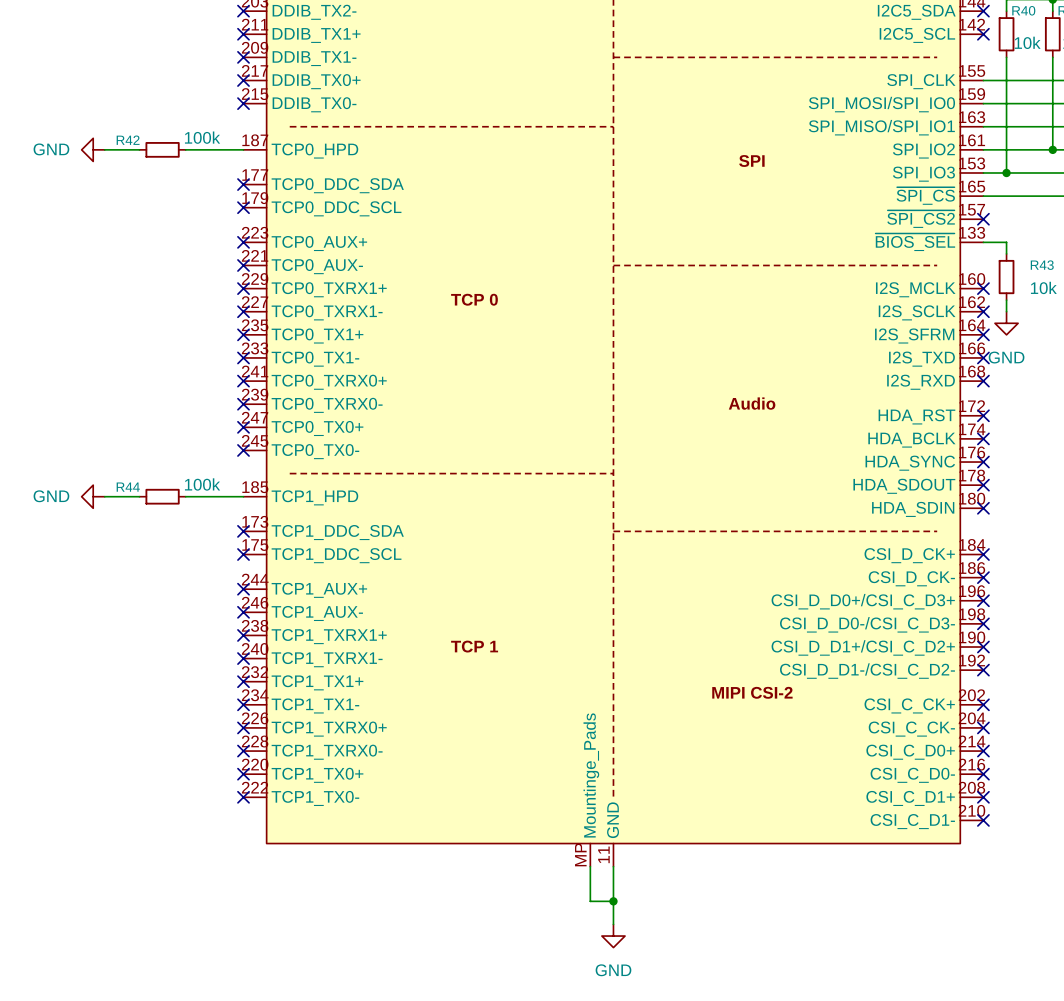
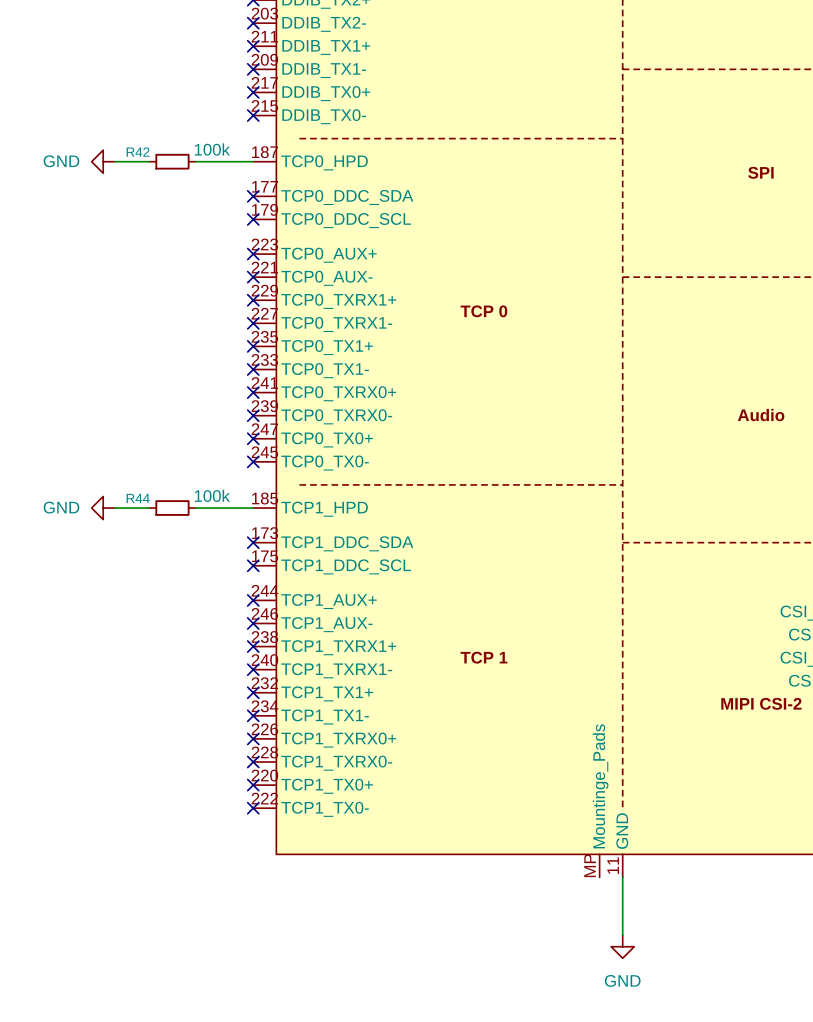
wire: (590, 866) (590, 901) (613, 901) -> none
junction: (613, 901) -> none

